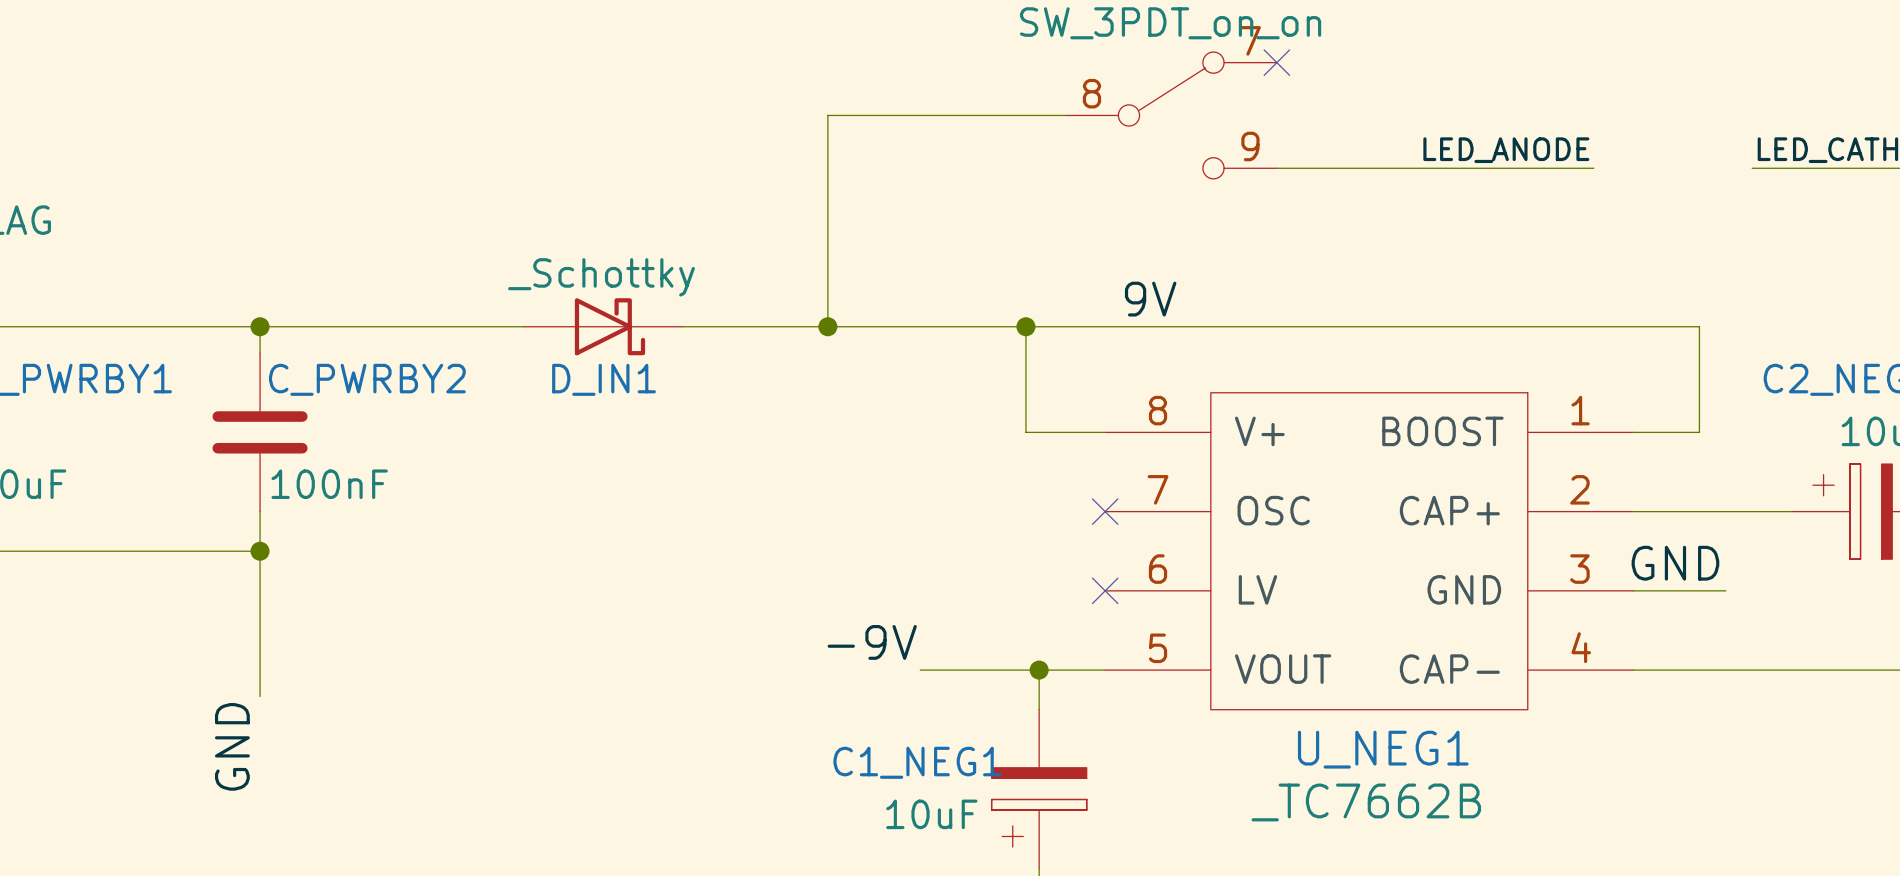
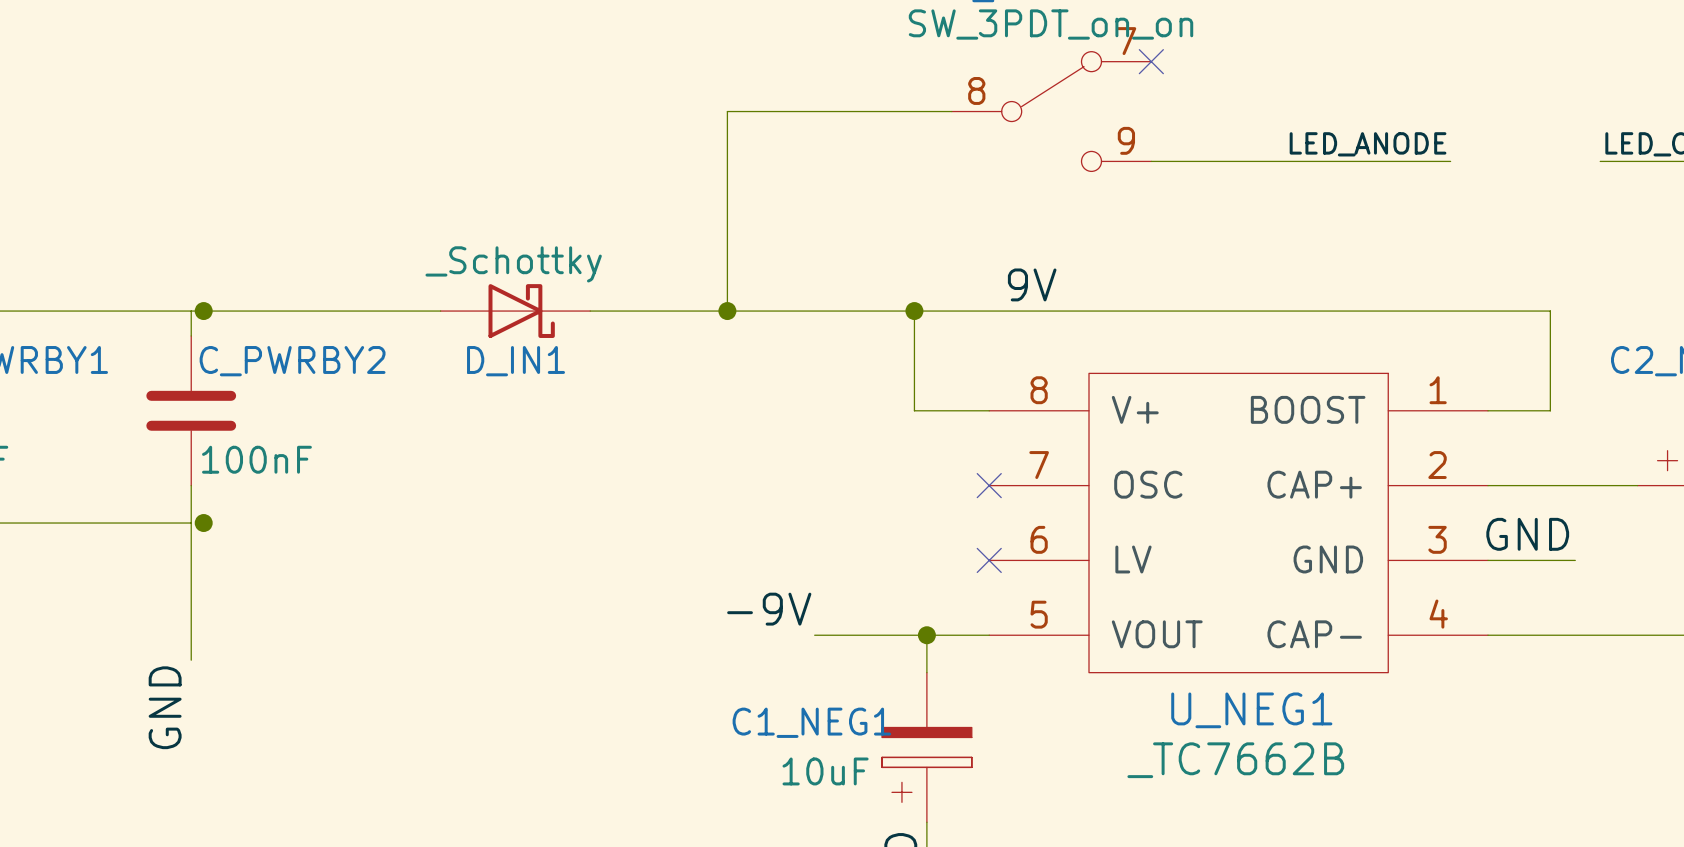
junction position: (260, 326) -> (203, 311)
junction position: (260, 551) -> (203, 523)

